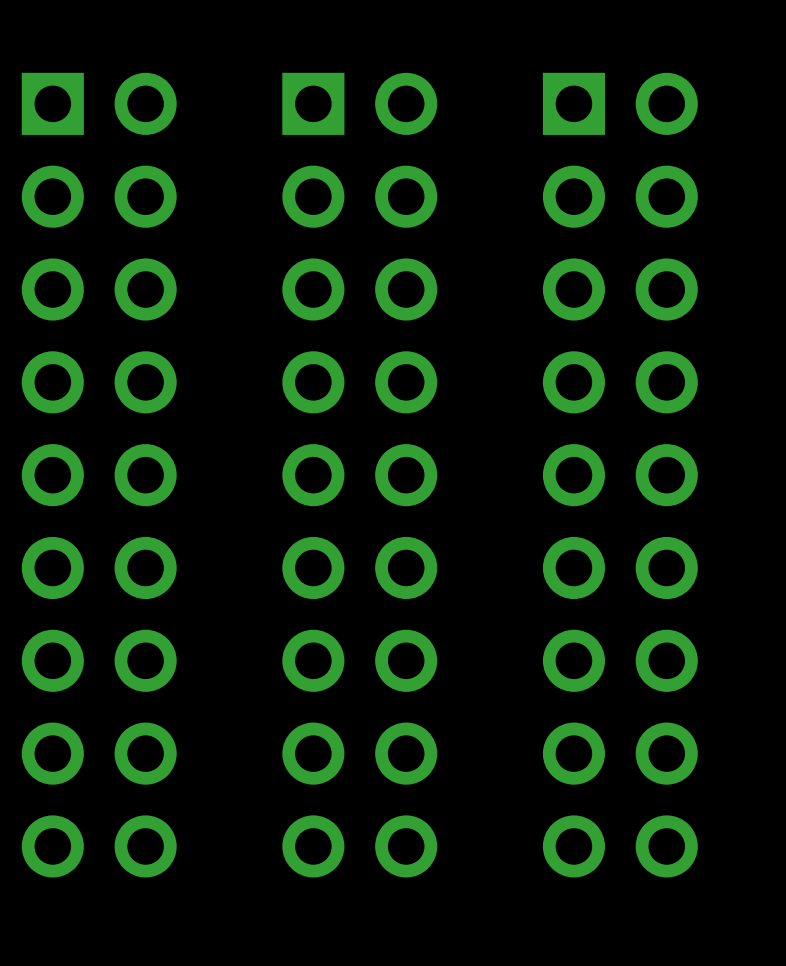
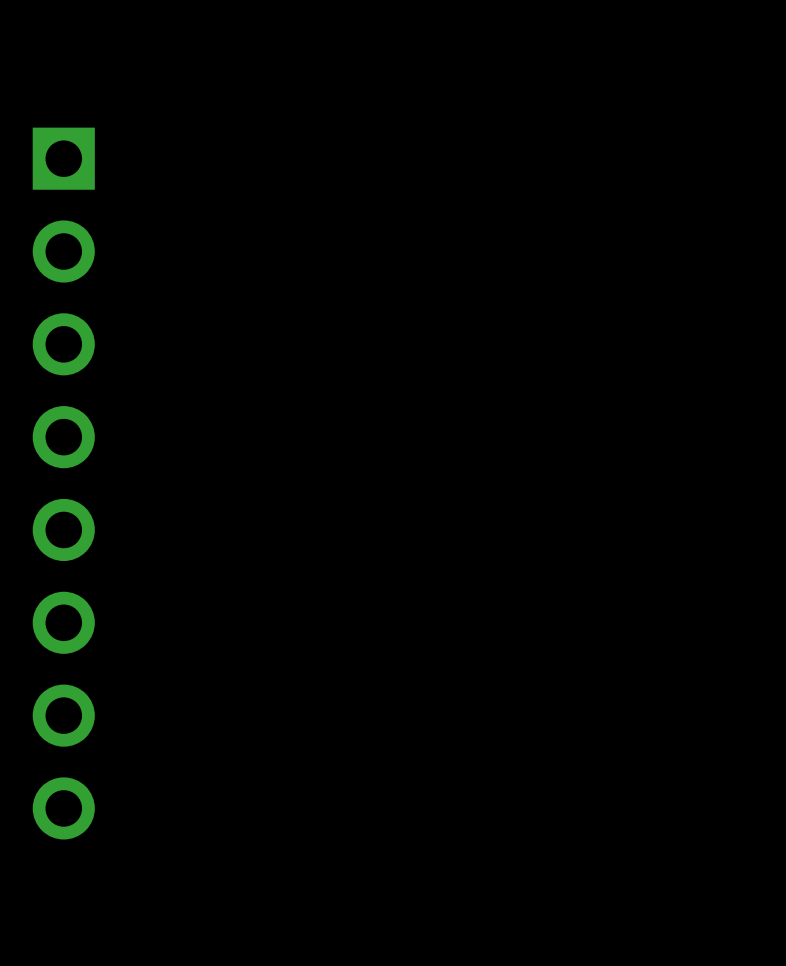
part footprint: [21, 72, 177, 878] -> [32, 127, 95, 840]
part: (359, 475) -> none
part: (620, 475) -> none

